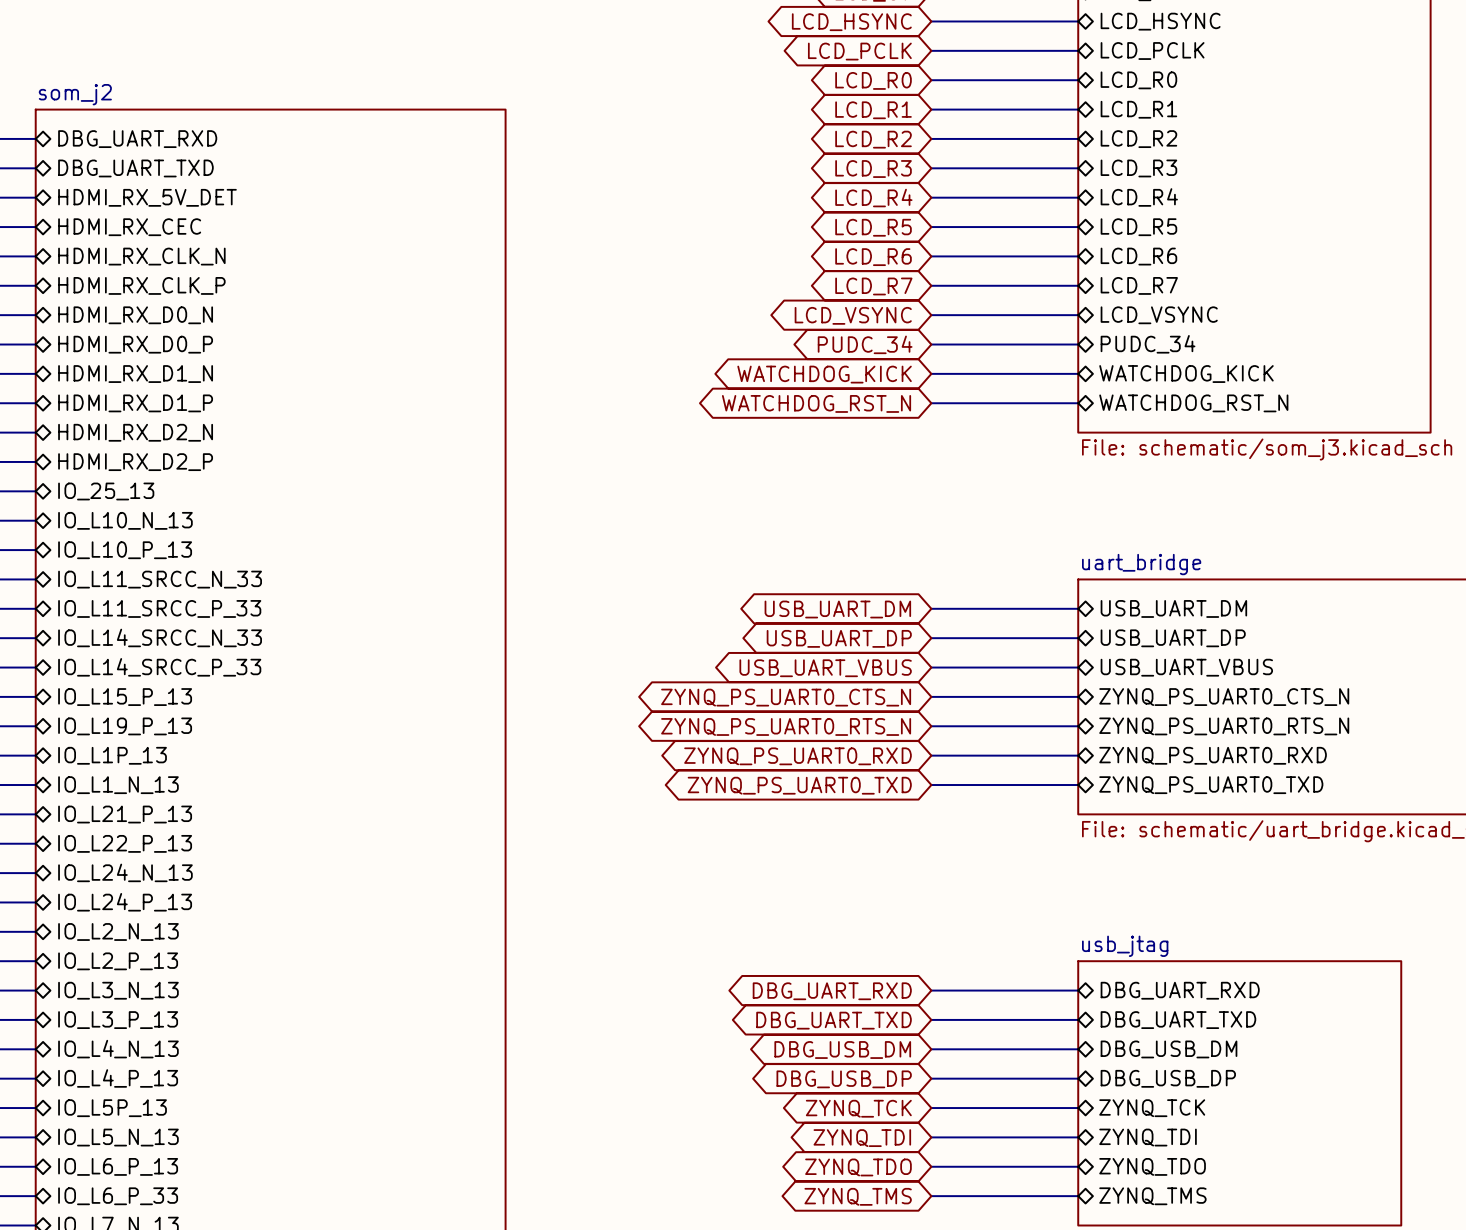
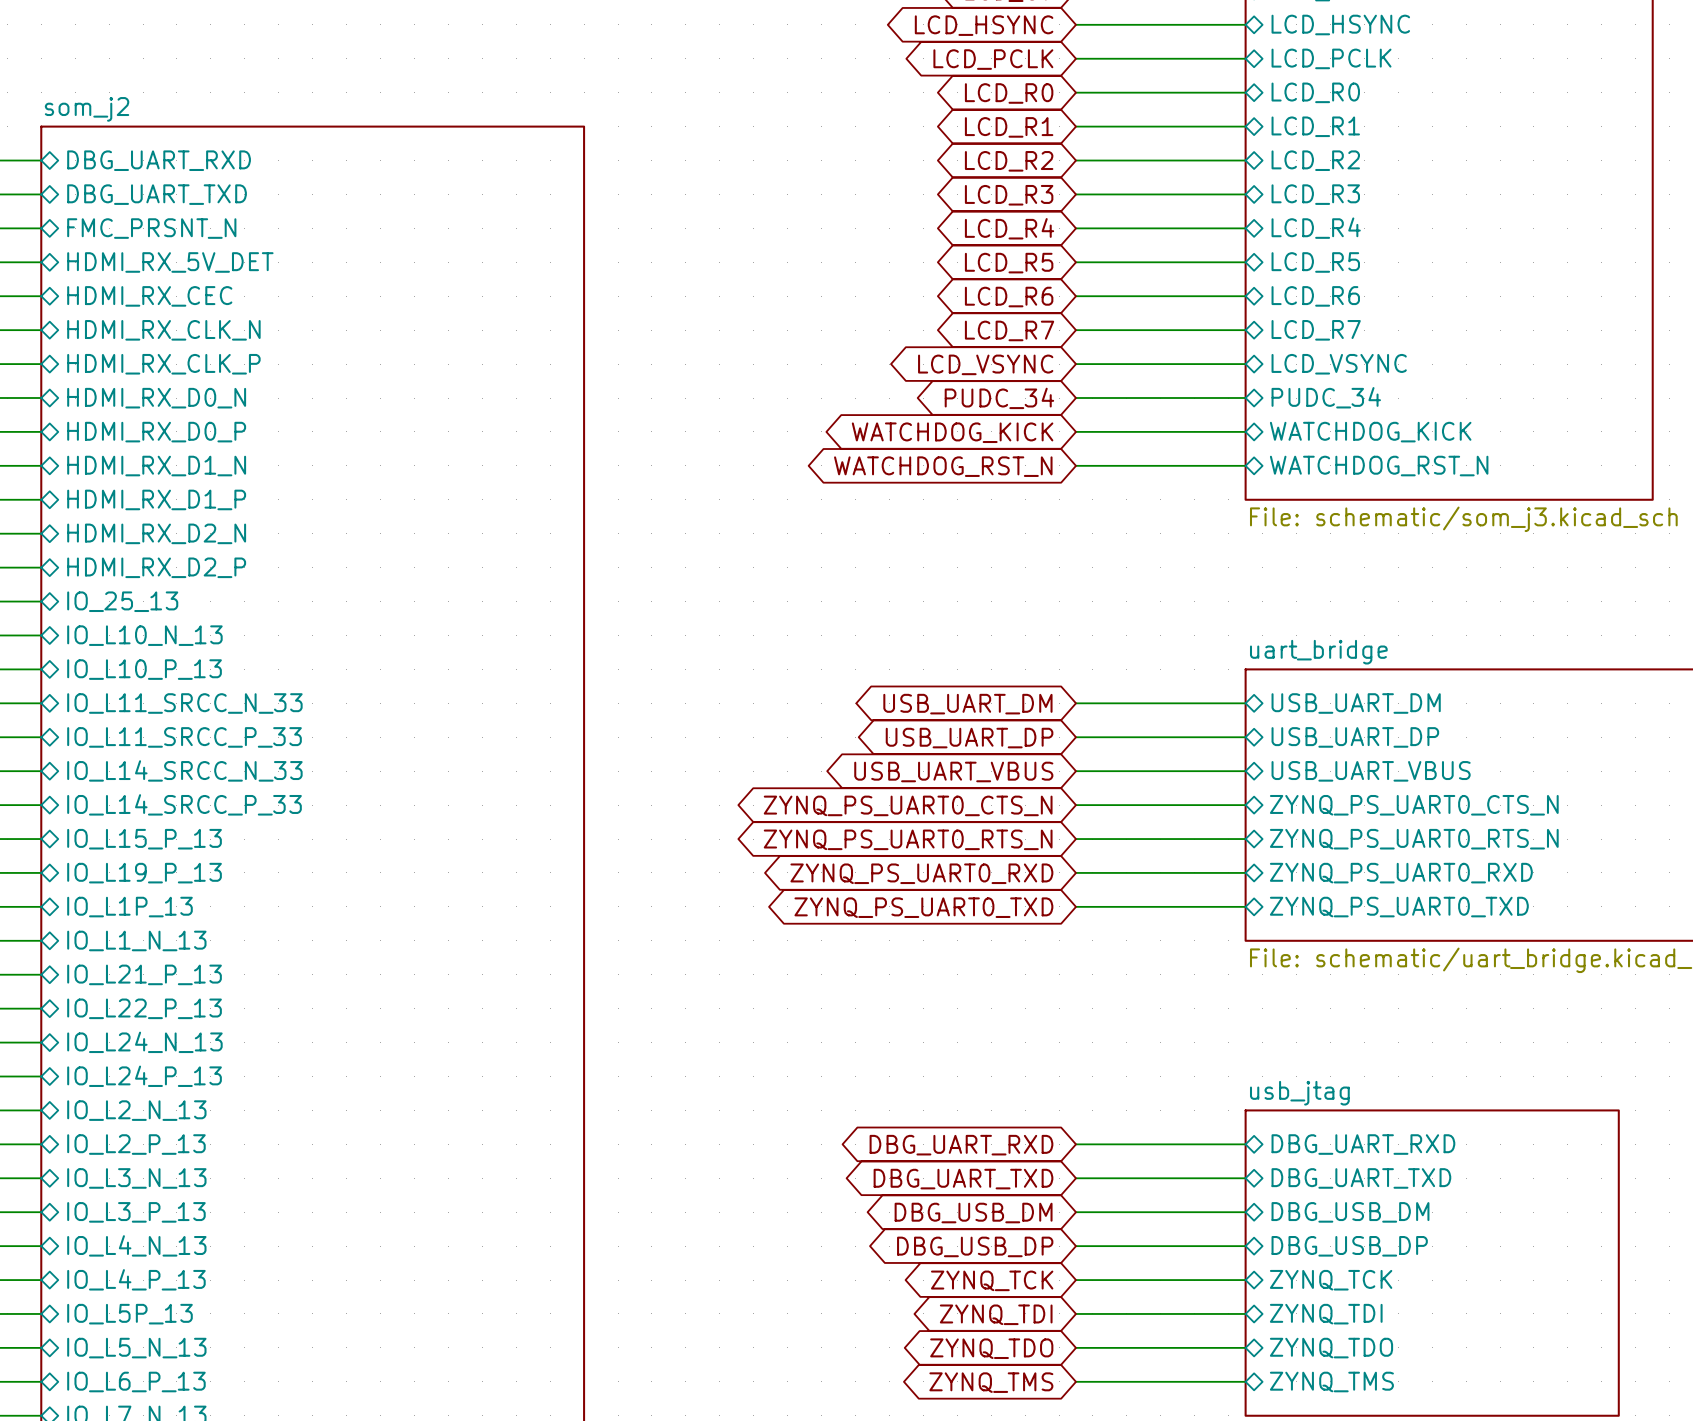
sheet pin: HDMI_RX_5V_DET (147, 197) -> FMC_PRSNT_N (151, 228)
sheet pin: HDMI_RX_CEC (129, 227) -> HDMI_RX_5V_DET (170, 262)
sheet pin: HDMI_RX_CLK_N (141, 256) -> HDMI_RX_CEC (149, 296)
sheet pin: HDMI_RX_CLK_P (141, 285) -> HDMI_RX_CLK_N (163, 330)
sheet pin: HDMI_RX_D0_N (135, 315) -> HDMI_RX_CLK_P (163, 364)
sheet pin: HDMI_RX_D0_P (135, 344) -> HDMI_RX_D0_N (156, 398)
sheet pin: HDMI_RX_D1_N (135, 374) -> HDMI_RX_D0_P (156, 432)
sheet pin: HDMI_RX_D1_P (135, 403) -> HDMI_RX_D1_N (156, 466)
sheet pin: HDMI_RX_D2_N (135, 432) -> HDMI_RX_D1_P (156, 499)
sheet pin: HDMI_RX_D2_P (135, 462) -> HDMI_RX_D2_N (156, 533)
sheet pin: IO_25_13 (106, 491) -> HDMI_RX_D2_P (156, 567)
sheet pin: IO_L10_N_13 (125, 520) -> IO_25_13 (122, 601)
sheet pin: IO_L10_P_13 (125, 550) -> IO_L10_N_13 (144, 635)
sheet pin: IO_L11_SRCC_N_33 (160, 579) -> IO_L10_P_13 (144, 669)
sheet pin: IO_L11_SRCC_P_33 (159, 608) -> IO_L11_SRCC_N_33 (184, 703)
sheet pin: IO_L14_SRCC_N_33 (160, 637) -> IO_L11_SRCC_P_33 (184, 737)
sheet pin: IO_L14_SRCC_P_33 (159, 667) -> IO_L14_SRCC_N_33 (184, 770)
sheet pin: IO_L15_P_13 (125, 697) -> IO_L14_SRCC_P_33 (184, 804)
sheet pin: IO_L19_P_13 (125, 726) -> IO_L15_P_13 (144, 839)
sheet pin: IO_L1P_13 (112, 755) -> IO_L19_P_13 (144, 873)
sheet pin: IO_L1_N_13 (118, 785) -> IO_L1P_13 (129, 907)
sheet pin: IO_L21_P_13 (125, 814) -> IO_L1_N_13 (136, 940)
sheet pin: IO_L22_P_13 (125, 843) -> IO_L21_P_13 (144, 974)
sheet pin: IO_L24_N_13 (125, 872) -> IO_L22_P_13 (144, 1008)
sheet pin: IO_L24_P_13 (125, 902) -> IO_L24_N_13 (144, 1042)
sheet pin: IO_L2_N_13 (118, 931) -> IO_L24_P_13 (144, 1076)
sheet pin: IO_L2_P_13 (118, 961) -> IO_L2_N_13 (136, 1110)
sheet pin: IO_L3_N_13 (118, 990) -> IO_L2_P_13 (136, 1144)
sheet pin: IO_L3_P_13 (118, 1020) -> IO_L3_N_13 (136, 1178)
sheet pin: IO_L4_N_13 (118, 1049) -> IO_L3_P_13 (136, 1212)
sheet pin: IO_L4_P_13 (118, 1078) -> IO_L4_N_13 (136, 1245)
sheet pin: IO_L5P_13 (112, 1108) -> IO_L4_P_13 (136, 1279)
sheet pin: IO_L5_N_13 (118, 1137) -> IO_L5P_13 (129, 1314)
sheet pin: IO_L6_P_13 (118, 1166) -> IO_L5_N_13 (136, 1348)
sheet pin: IO_L6_P_33 (118, 1196) -> IO_L6_P_13 (136, 1382)

